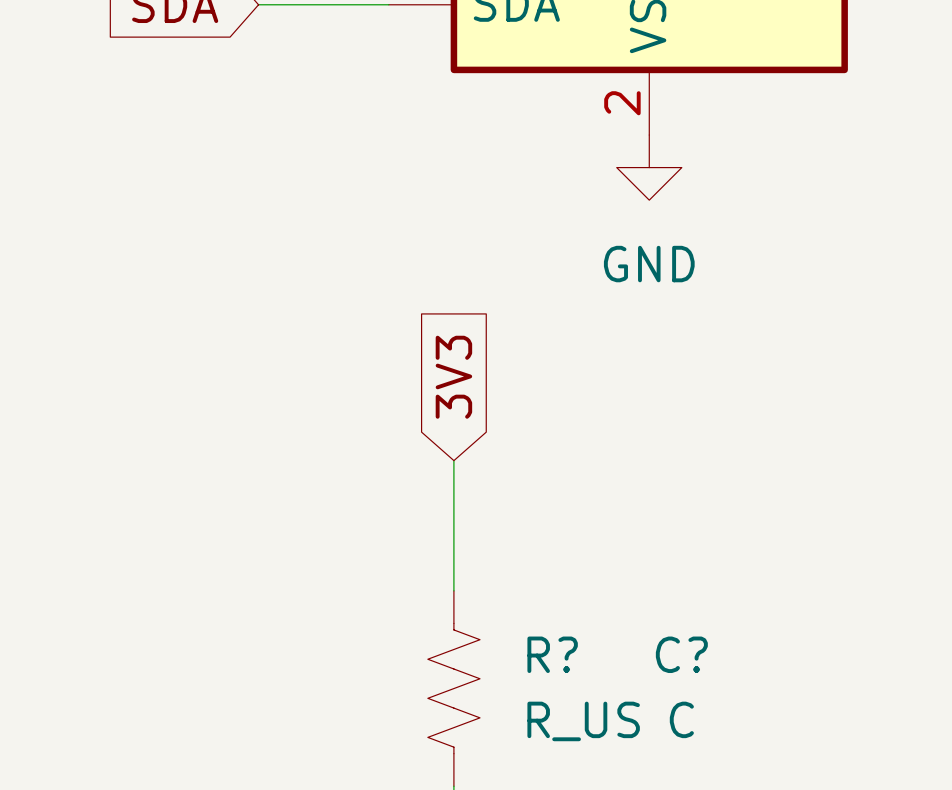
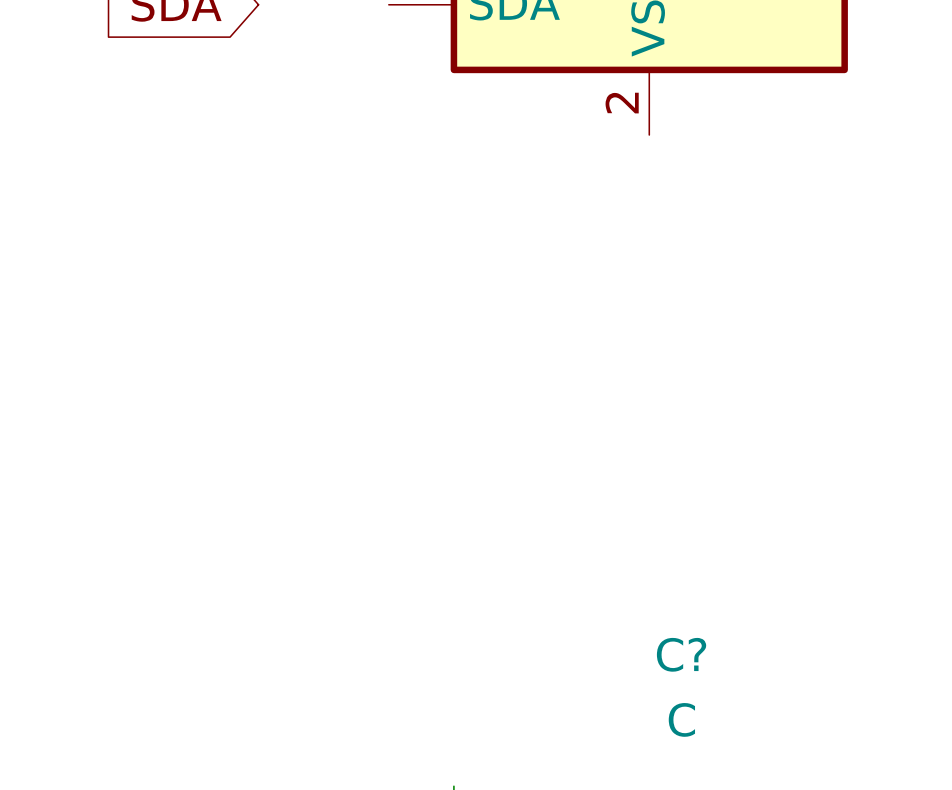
wire: (258, 4) (388, 4) -> none
power symbol: GND (649, 167) -> none
global label: 3V3 (453, 377) -> none
wire: (453, 460) (453, 590) -> none
R?: R_US (453, 688) -> none

